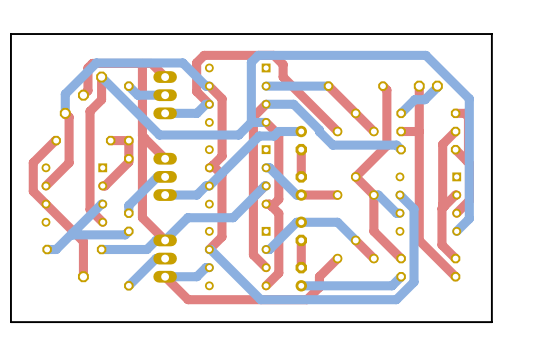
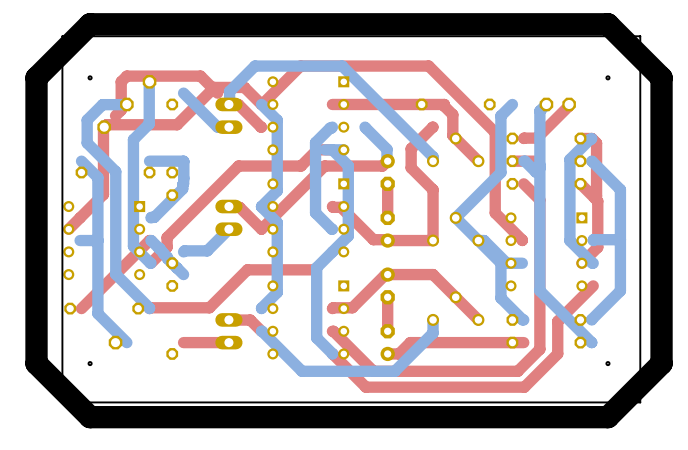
board edge: none -> (607, 24) (90, 24) (36, 77) (36, 363) (90, 417) (607, 417) (661, 363) (661, 77) (607, 24)
board edge: (491, 34) (10, 34) (10, 322) (491, 322) (491, 34) -> (640, 36) (640, 402) (62, 402) (62, 36) (640, 36)
top track: (231, 55) (204, 55) (196, 62) (196, 91) (209, 104) -> (300, 66) (262, 104) (244, 87) (214, 87) (177, 124) (106, 124) (103, 127) (103, 194) (97, 200)
bottom track: (258, 55) (251, 62) (251, 122) (238, 135) (159, 135) (101, 77) -> (334, 66) (255, 66) (229, 91) (228, 104)
bottom track: (264, 55) (425, 55) (469, 98) (469, 218) (456, 231) -> (342, 66) (433, 156) (433, 161)
top track: (273, 55) (283, 64) (283, 77) (337, 131) -> (353, 66) (428, 66) (495, 132) (495, 213) (522, 240)
top track: (142, 63) (142, 136) (165, 158) -> none
hole: none -> (90, 77)
hole: none -> (607, 77)
bottom track: none -> (149, 81) (149, 123) (133, 139) (133, 246) (150, 263)
part: none -> (149, 81)
top track: (101, 77) (101, 99) (90, 111) (90, 209) (102, 222) -> none
part: (101, 77) -> none
bottom track: none -> (183, 93) (217, 126) (228, 127)
part: none -> (126, 104)
bottom track: (128, 86) (137, 95) (165, 95) -> none
top track: none -> (228, 104) (238, 104) (261, 127)
bottom track: none -> (261, 104) (277, 120) (277, 190) (261, 206) (277, 222) (277, 292) (261, 308)
bottom track: (209, 86) (205, 86) (182, 62) (96, 62) (73, 86) -> (126, 104) (102, 104)
top track: (209, 86) (222, 98) (222, 156) (209, 167) -> none
bottom track: (328, 86) (266, 86) -> none
top track: (328, 86) (353, 111) -> (332, 104) (444, 104) (452, 114) (452, 135)
top track: (382, 86) (386, 90) (386, 145) (355, 176) (373, 195) (373, 231) (401, 258) -> none
bottom track: none -> (512, 104) (500, 115) (500, 172) (455, 217) (501, 263) (500, 298) (523, 319)
top track: (419, 86) (419, 240) (455, 276) -> none
part: (419, 86) -> none
bottom track: none -> (546, 104) (539, 111) (539, 290) (591, 342)
part: none -> (546, 104)
bottom track: (437, 86) (424, 99) (414, 99) (401, 113) -> none
part: (437, 86) -> none
top track: none -> (569, 104) (536, 138) (523, 138)
part: none -> (569, 104)
bottom track: (65, 94) (65, 113) -> (92, 114) (87, 120) (87, 143) (115, 171) (115, 274) (149, 308)
part: (83, 95) -> none
part: (165, 95) -> none
part: none -> (228, 115)
part: none -> (104, 127)
bottom track: (209, 104) (205, 104) (196, 113) (165, 113) -> none
bottom track: none -> (332, 127) (315, 142) (315, 212) (332, 229)
bottom track: (266, 104) (293, 104) (332, 145) (396, 145) (401, 149) -> none
top track: (266, 104) (253, 116) (253, 197) -> none
top track: none -> (433, 127) (411, 148) (411, 167) (433, 189) (433, 240)
top track: (65, 113) (69, 117) (69, 162) -> none
part: (65, 113) -> none
bottom track: none -> (591, 138) (569, 159) (569, 240) (593, 263)
bottom track: none -> (332, 149) (348, 165) (348, 236) (316, 267) (316, 337) (332, 353)
top track: none -> (332, 149) (317, 149) (301, 166) (238, 166) (167, 237) (167, 247) (150, 263)
top track: (266, 122) (278, 135) (278, 199) (271, 206) -> none
bottom track: none -> (81, 161) (97, 177) (97, 313) (126, 342)
bottom track: none -> (149, 161) (183, 161) (182, 188) (154, 217) (150, 217)
bottom track: (301, 131) (278, 131) (274, 136) (259, 136) (209, 185) (205, 185) (196, 195) (165, 195) -> (387, 161) (386, 149) (365, 127)
top track: none -> (387, 161) (382, 166) (324, 166) (261, 229) (239, 207) (228, 206)
bottom track: none -> (523, 161) (535, 172) (539, 168)
top track: (455, 131) (442, 144) (442, 204) (444, 206) -> none
bottom track: none -> (591, 161) (620, 189) (620, 290) (591, 319)
top track: (144, 138) (142, 140) (142, 217) (165, 240) -> none
top track: (56, 140) (33, 162) (33, 191) (83, 241) (83, 276) -> none
top track: (110, 140) (128, 140) (128, 162) (104, 185) (102, 185) -> none
top track: (212, 165) (221, 174) (221, 236) (209, 249) -> none
top track: none -> (332, 206) (341, 207) (373, 239) (387, 240)
bottom track: (266, 167) (269, 167) (296, 195) (301, 195) -> none
bottom track: (165, 176) (157, 176) (128, 205) (128, 213) -> none
part: (165, 176) -> none
part: none -> (228, 217)
bottom track: none -> (228, 229) (207, 250) (183, 251)
bottom track: (266, 185) (233, 217) (187, 217) (165, 240) (156, 240) (146, 249) (101, 249) -> none
top track: (266, 185) (253, 197) (253, 254) (266, 267) -> none
bottom track: none -> (620, 239) (593, 240)
bottom track: none -> (97, 240) (80, 240)
bottom track: none -> (150, 240) (176, 267)
top track: none -> (150, 240) (81, 308)
bottom track: (399, 195) (414, 209) (414, 282) (396, 299) (307, 299) -> (433, 319) (433, 333) (394, 371)
top track: (456, 195) (441, 208) (441, 244) (455, 258) -> none
bottom track: (102, 204) (56, 249) (47, 249) -> none
top track: (266, 204) (269, 204) (278, 213) (278, 273) (266, 285) -> none
bottom track: none -> (522, 263) (510, 263)
bottom track: none -> (177, 267) (183, 274)
top track: none -> (315, 269) (247, 269) (209, 307) (149, 308)
bottom track: (128, 231) (125, 234) (72, 233) -> none
top track: none -> (593, 285) (557, 321) (557, 353) (524, 387) (365, 387) (332, 353)
bottom track: (355, 240) (337, 222) (296, 222) (269, 249) (266, 249) -> none
top track: none -> (455, 297) (433, 274) (387, 274) (352, 307) (332, 308)
bottom track: (209, 249) (260, 299) -> (261, 331) (302, 371) (337, 371)
bottom track: (165, 258) (156, 258) (128, 285) -> none
part: (165, 258) -> none
top track: none -> (228, 319) (250, 320) (261, 331)
top track: (337, 258) (319, 276) (319, 287) (307, 299) -> (523, 183) (539, 199) (539, 349) (517, 371) (394, 371)
part: none -> (228, 331)
bottom track: (209, 267) (205, 267) (196, 276) (165, 276) -> none
top track: (165, 276) (188, 299) (289, 299) -> (332, 331) (373, 371)
top track: none -> (228, 342) (183, 342)
bottom track: (401, 276) (392, 285) (301, 285) -> none
top track: none -> (523, 342) (410, 342) (399, 353) (387, 353)
hole: none -> (90, 363)
hole: none -> (607, 363)

